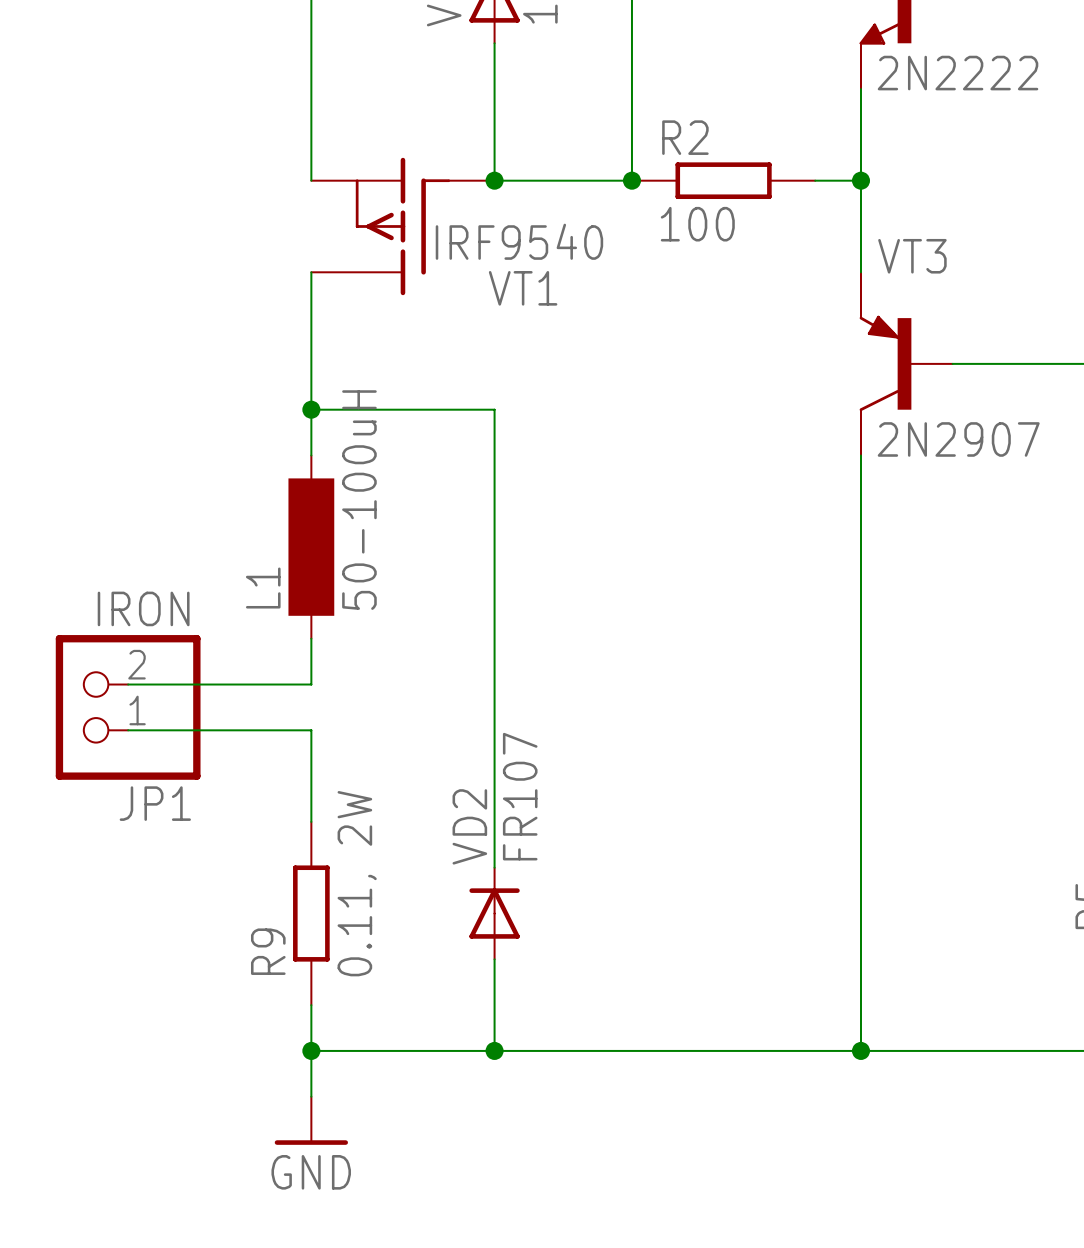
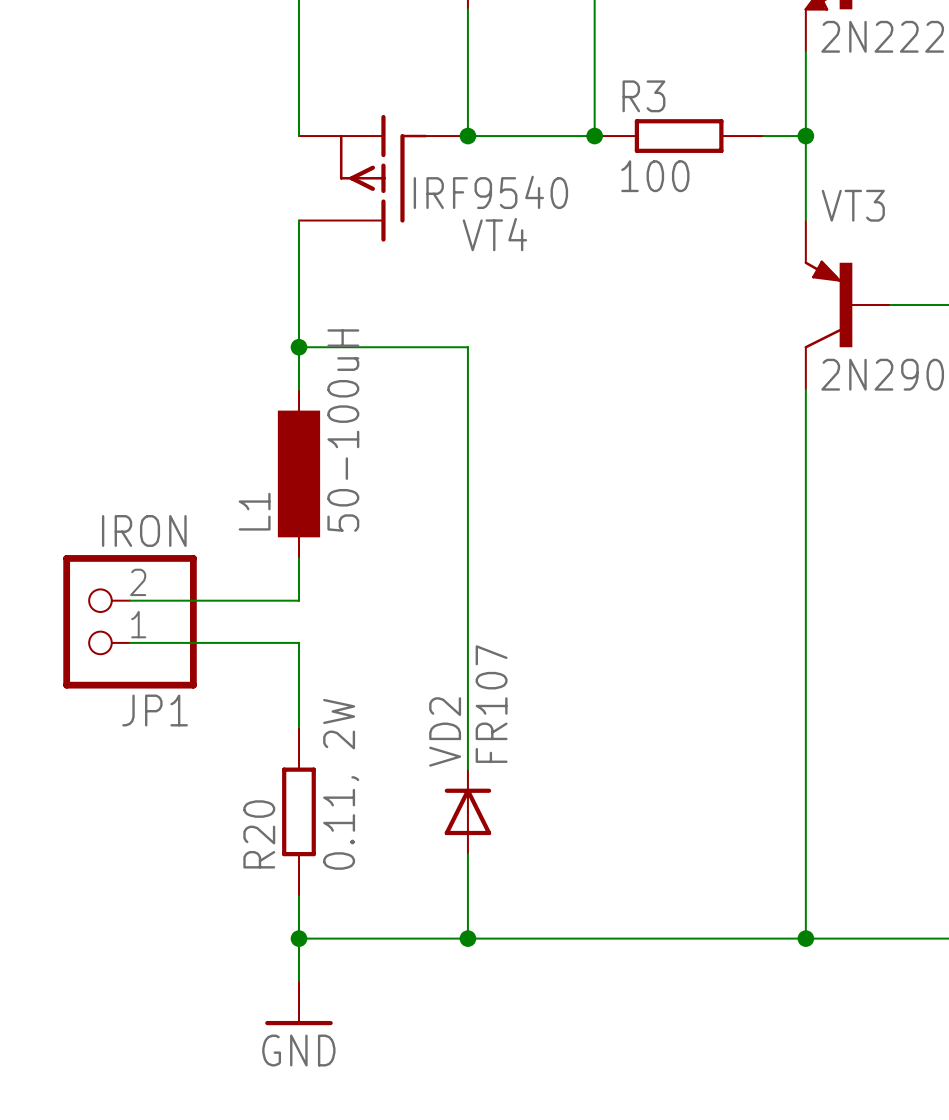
R2 name: R2 (685, 137) -> R3 (643, 96)
VT1 name: VT1 (523, 288) -> VT4 (494, 234)
R9 name: R9 (268, 951) -> R20 (259, 834)

